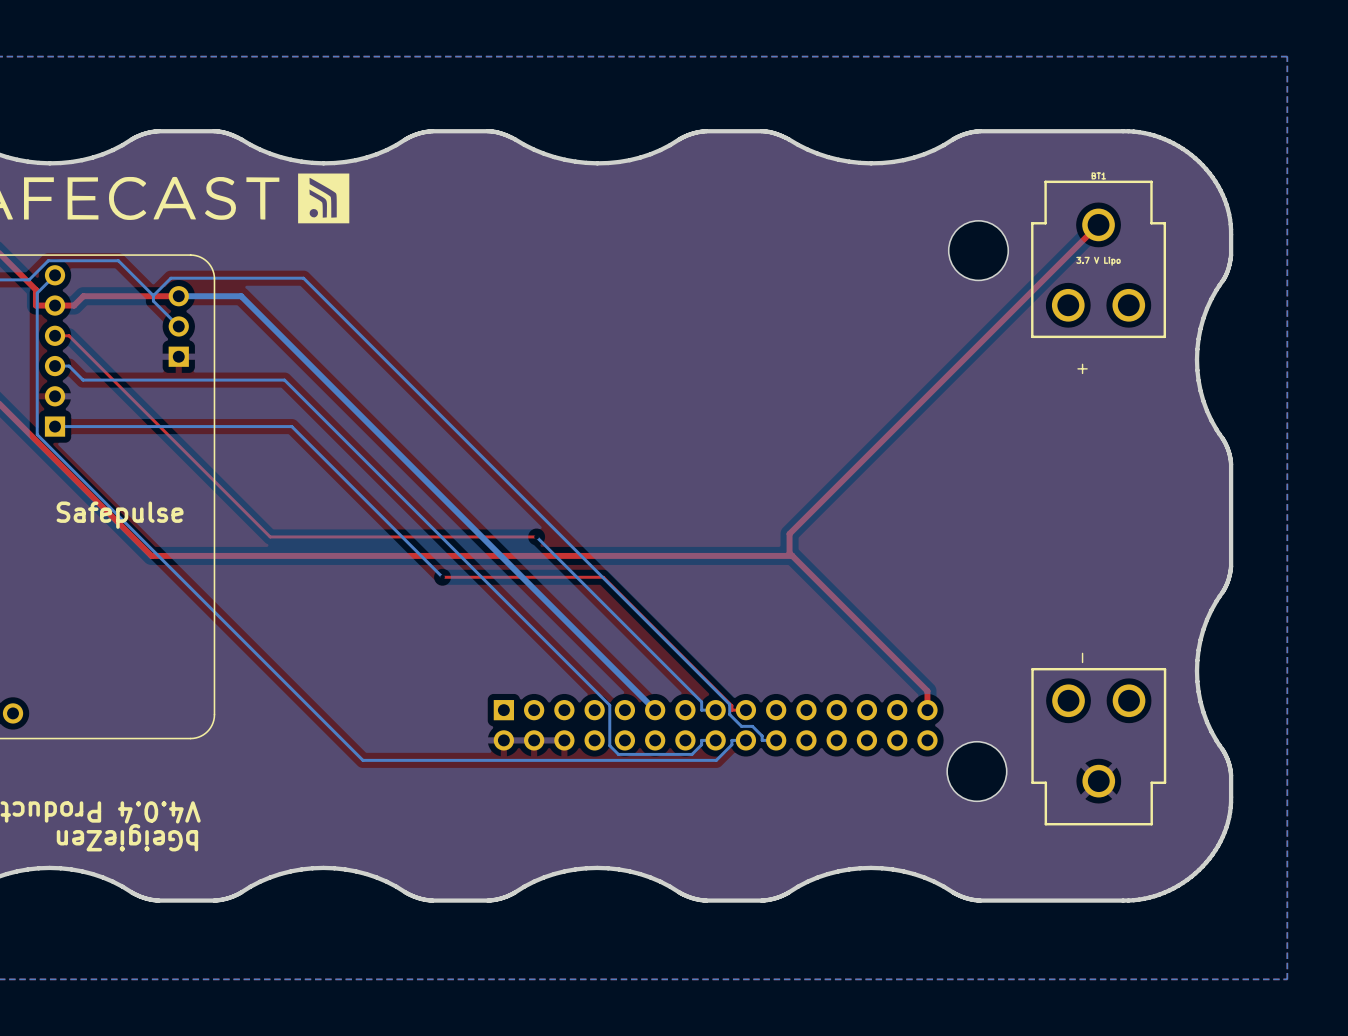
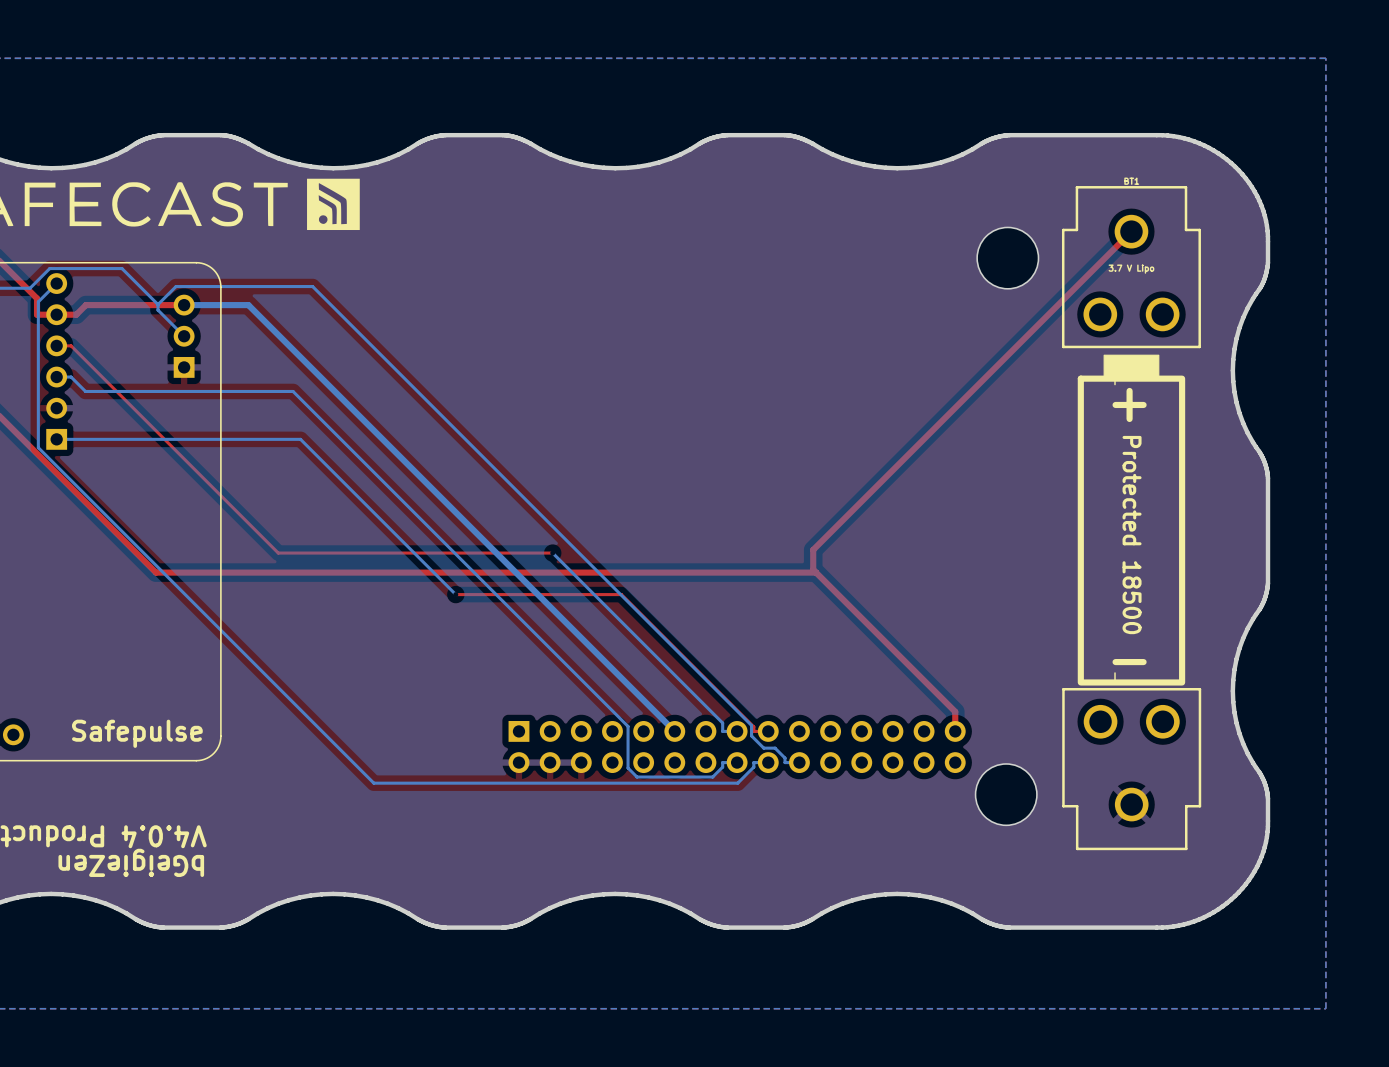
drawing: none -> [1077, 354, 1186, 686]
text position: Safepulse (120, 515) -> Safepulse (137, 733)

